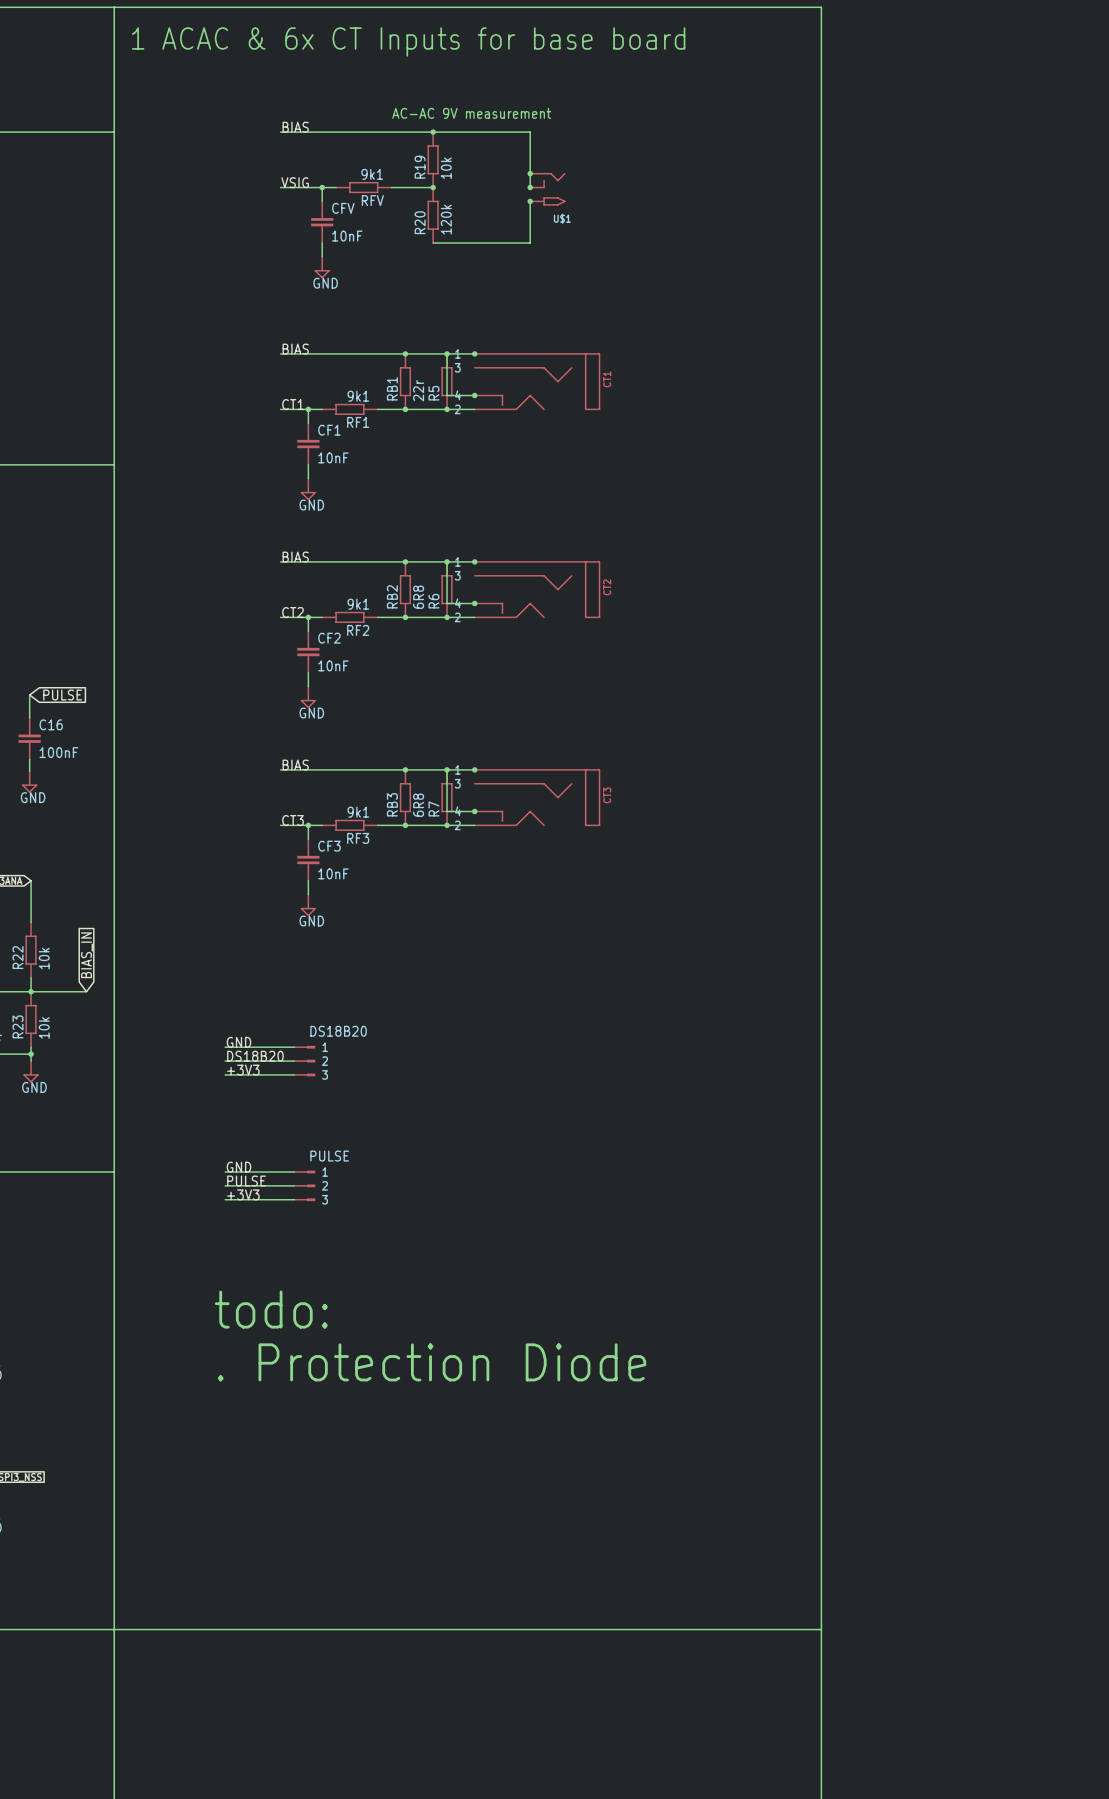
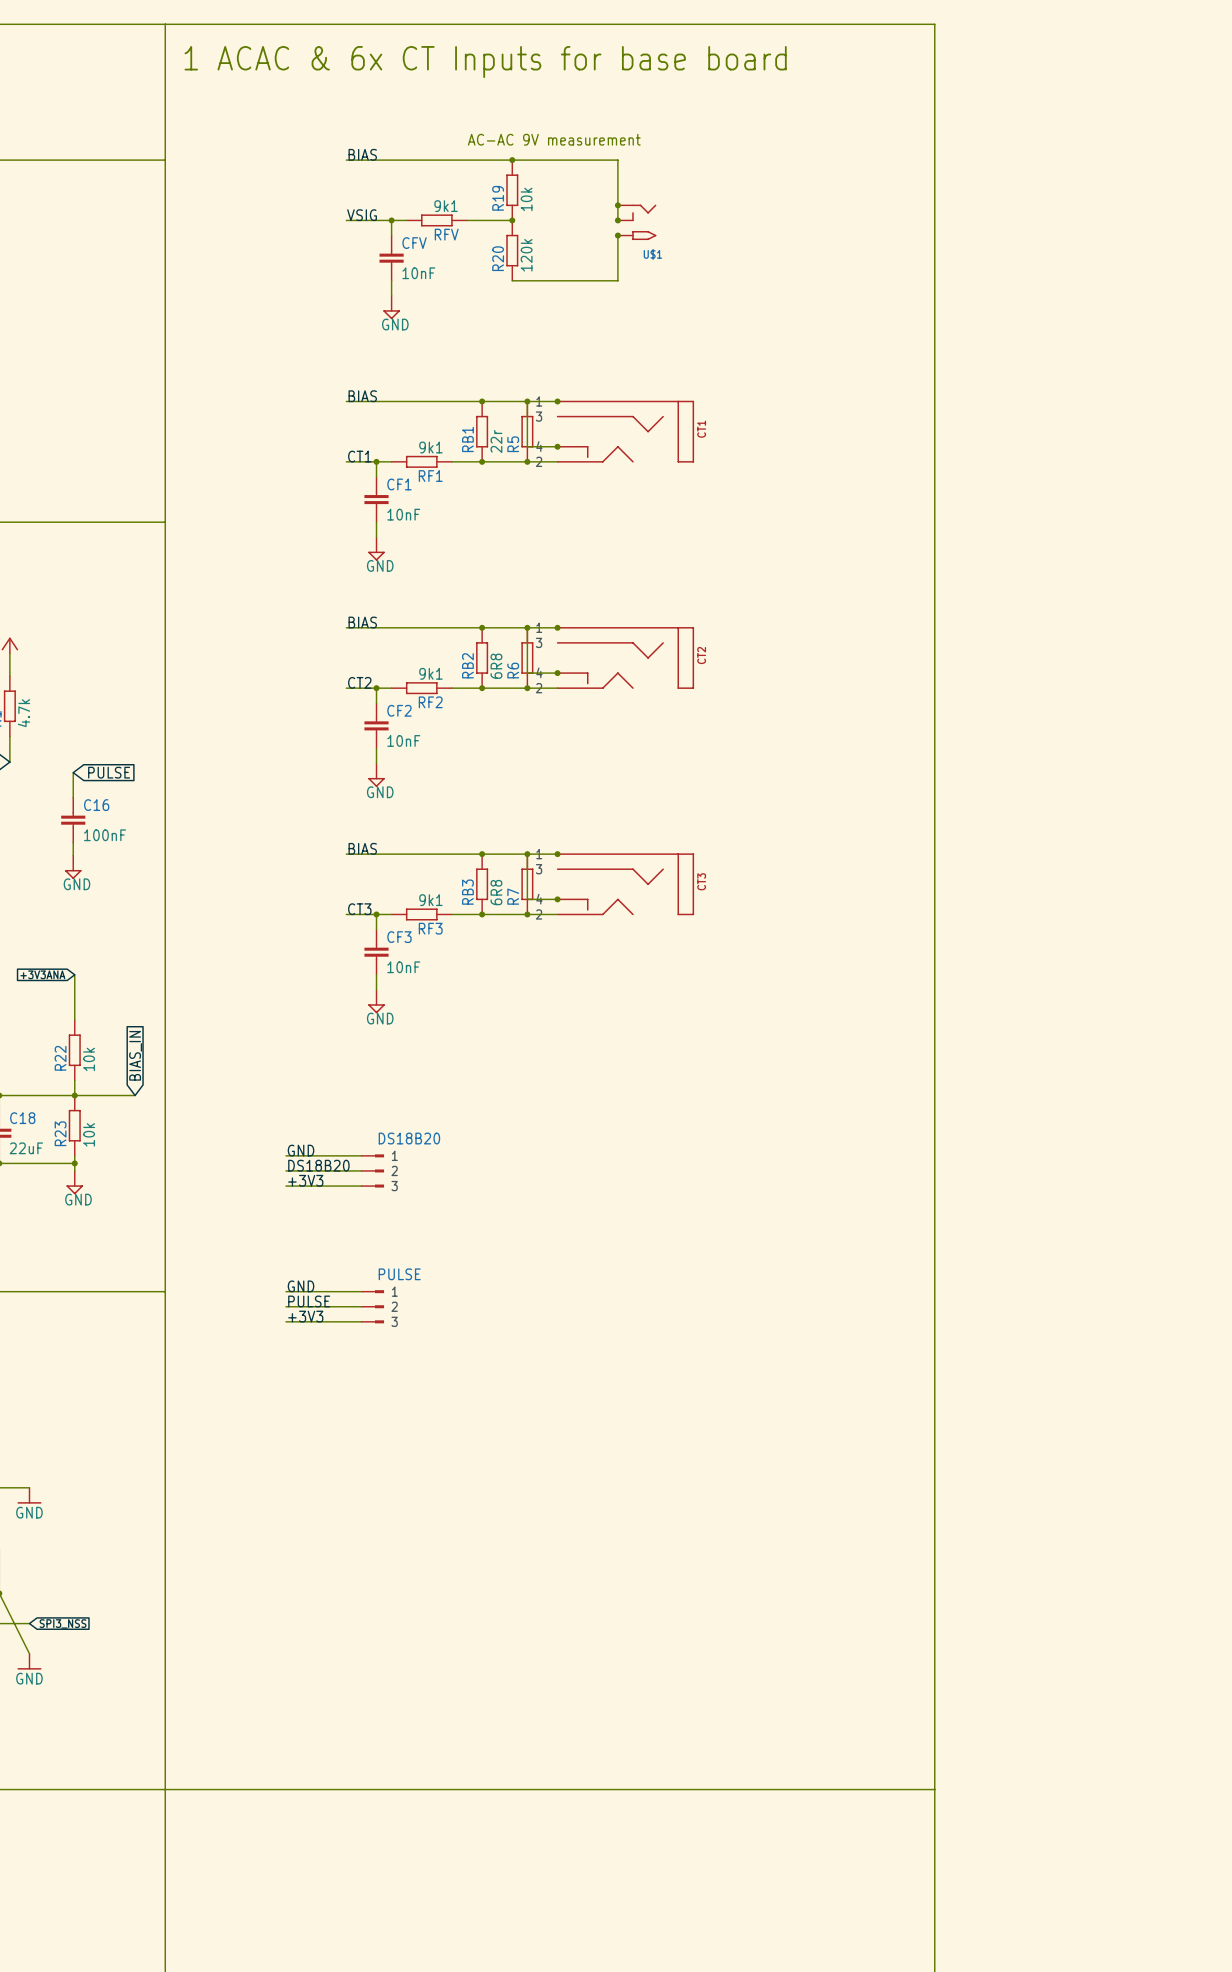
text: todo: (271, 1309) -> none
text: . Protection Diode (432, 1362) -> none

